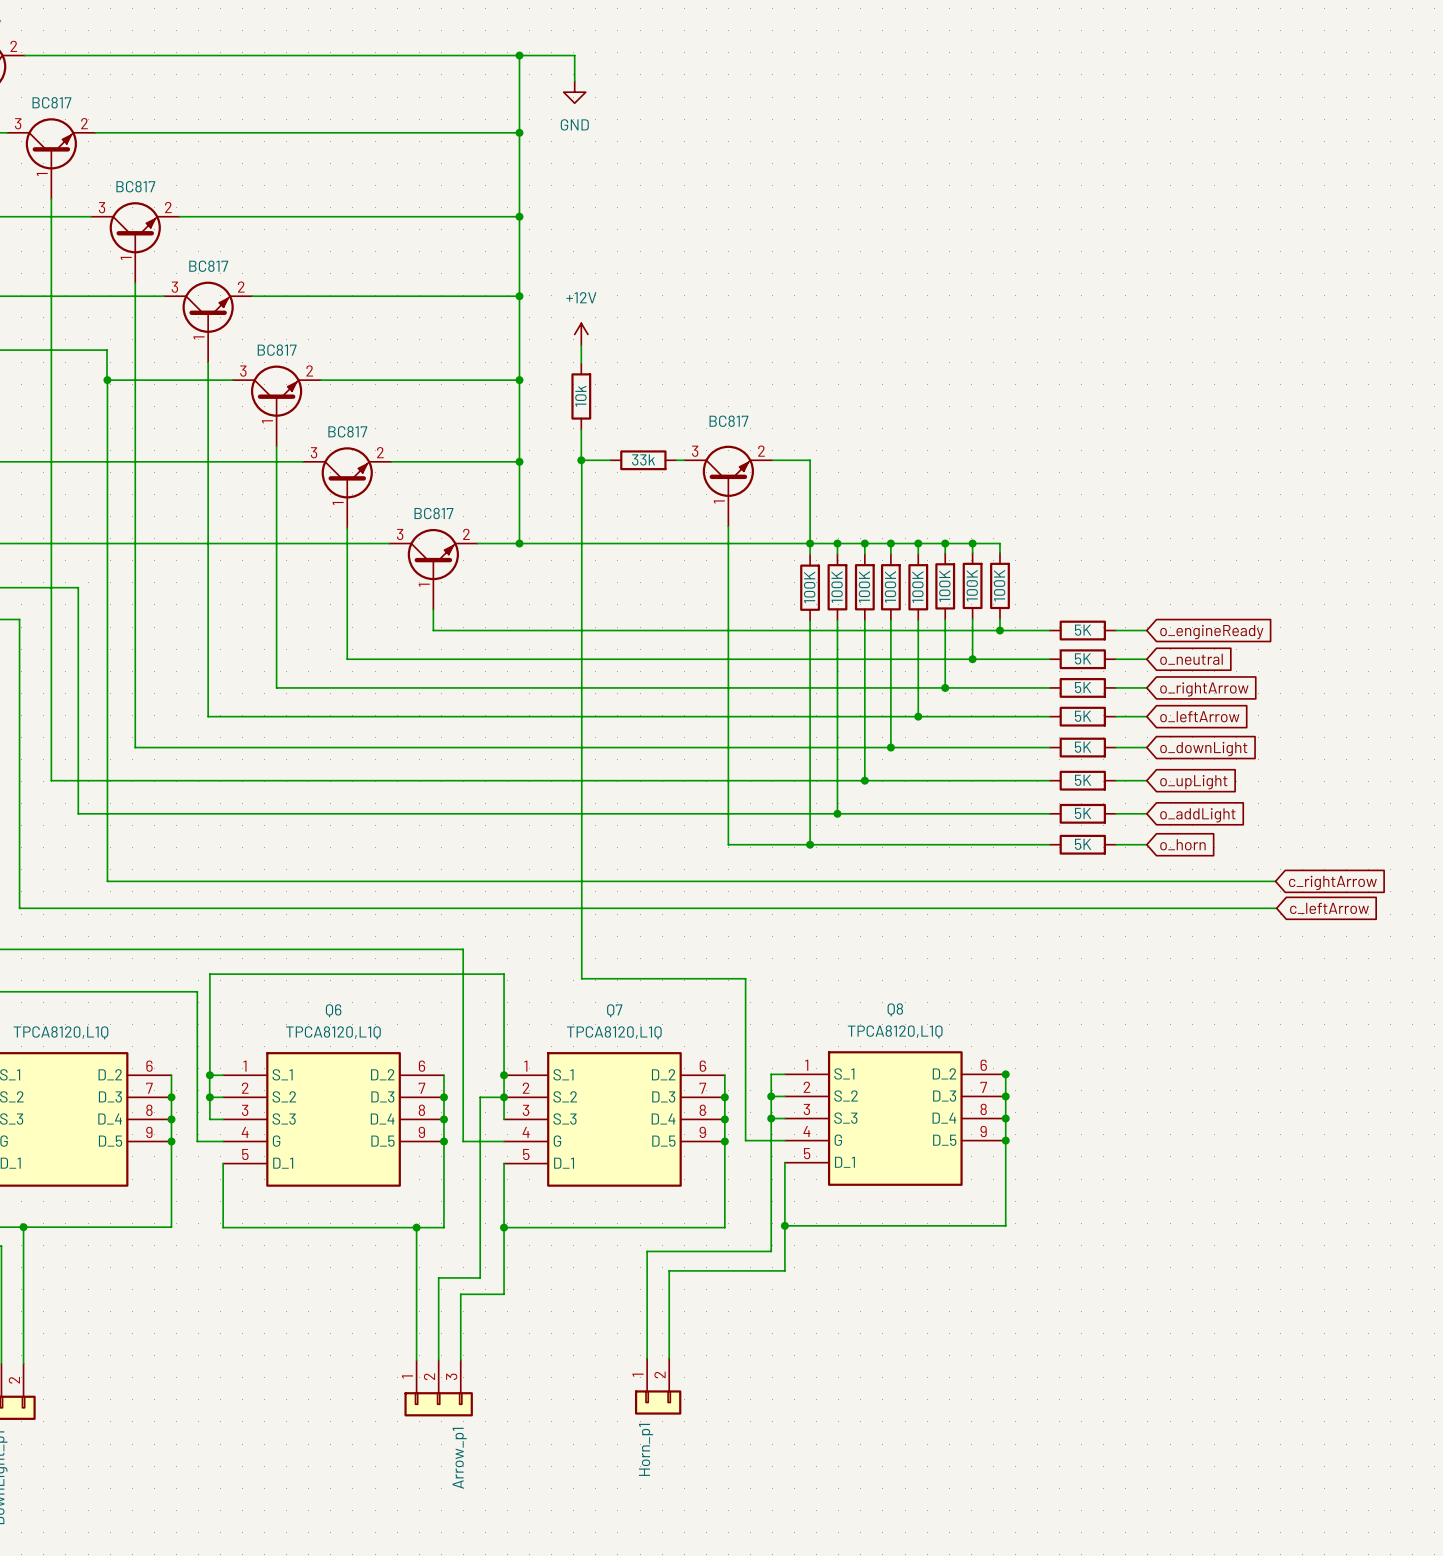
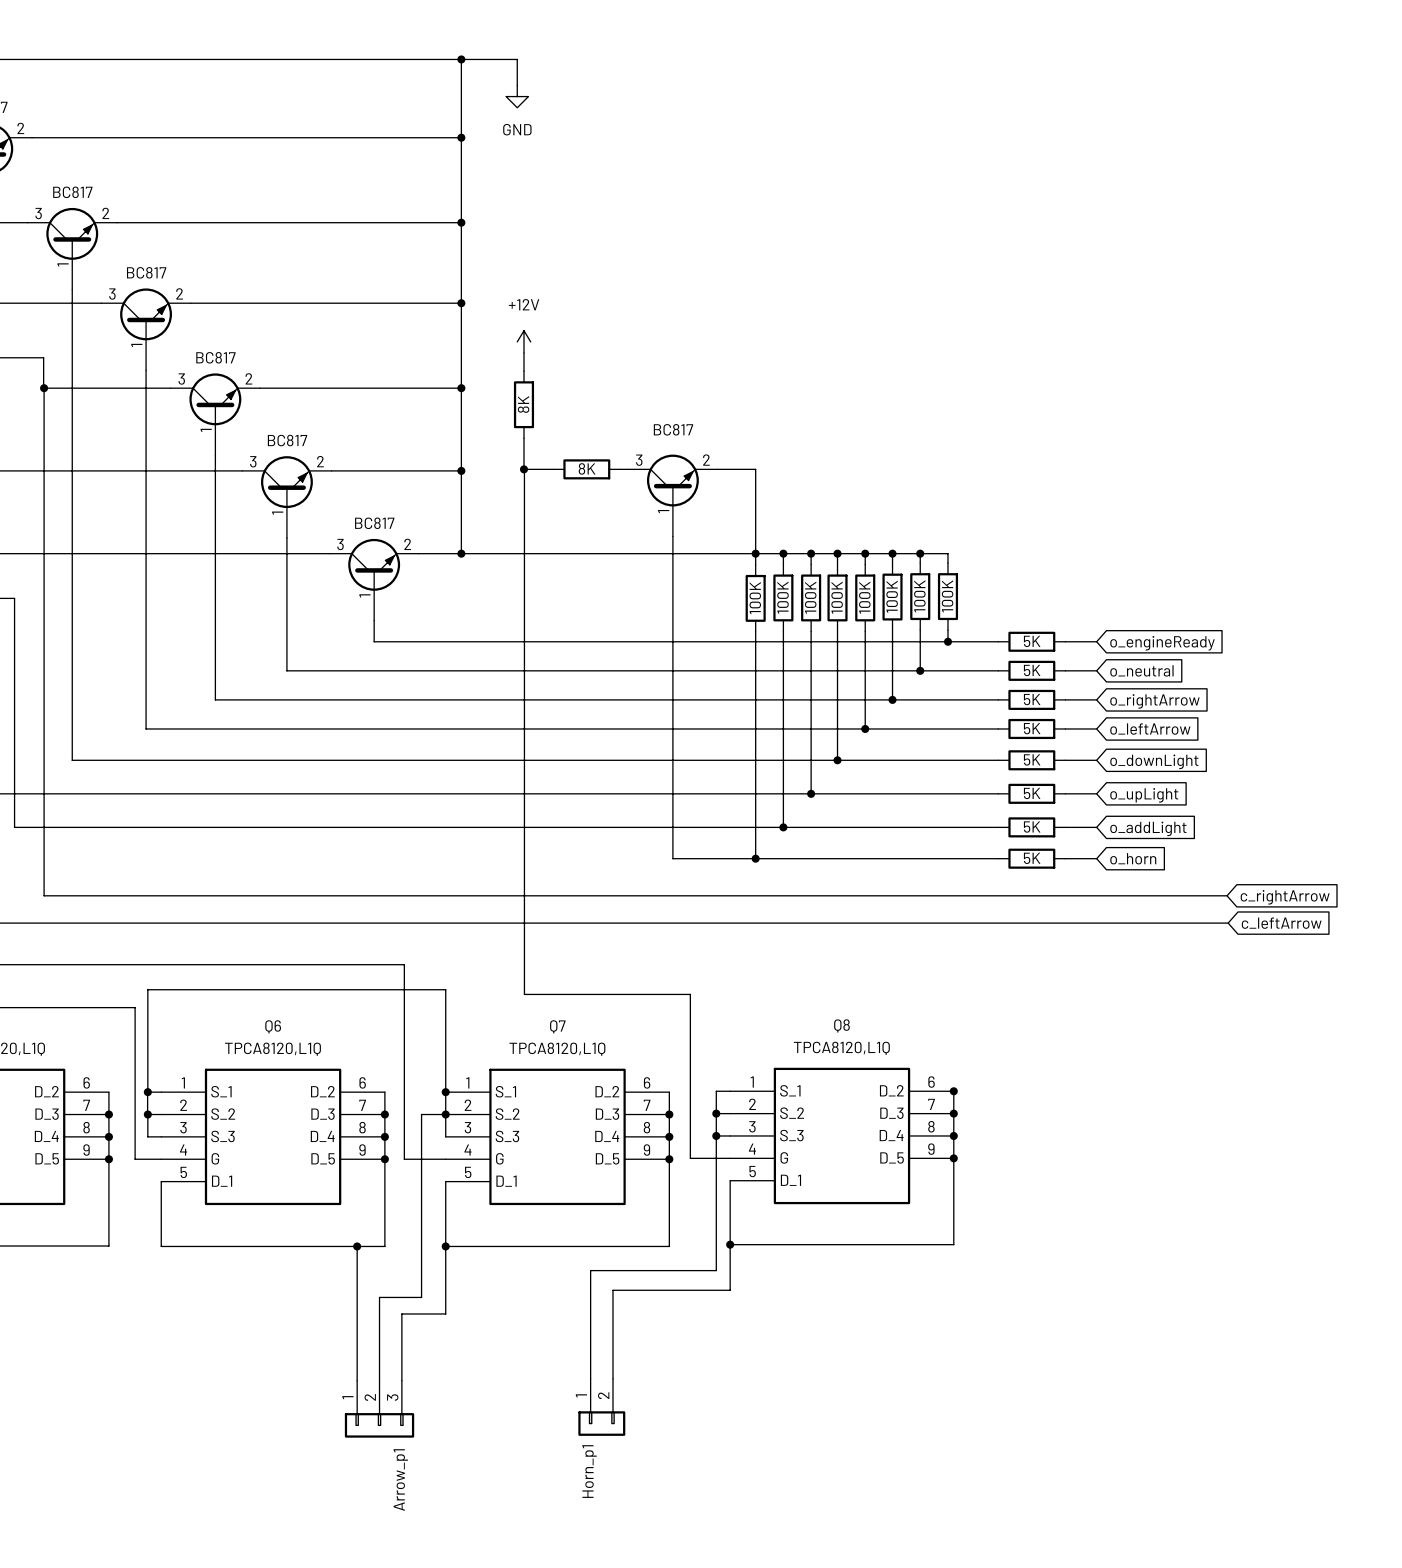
part value: 10k (580, 396) -> 8K (523, 404)
part value: 33k (643, 459) -> 8K (587, 468)

